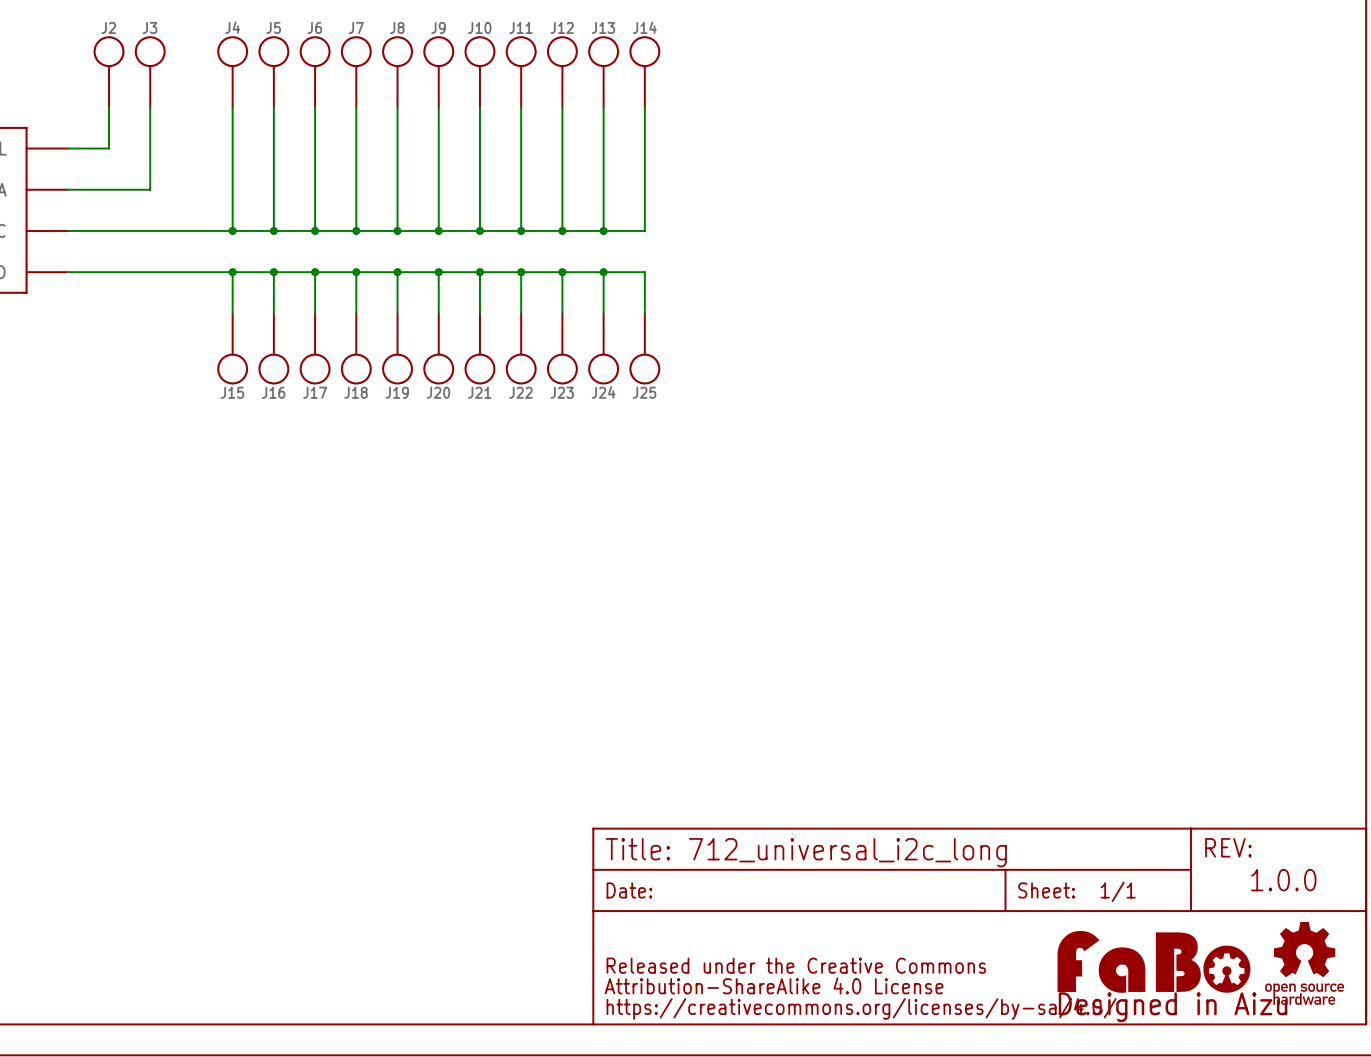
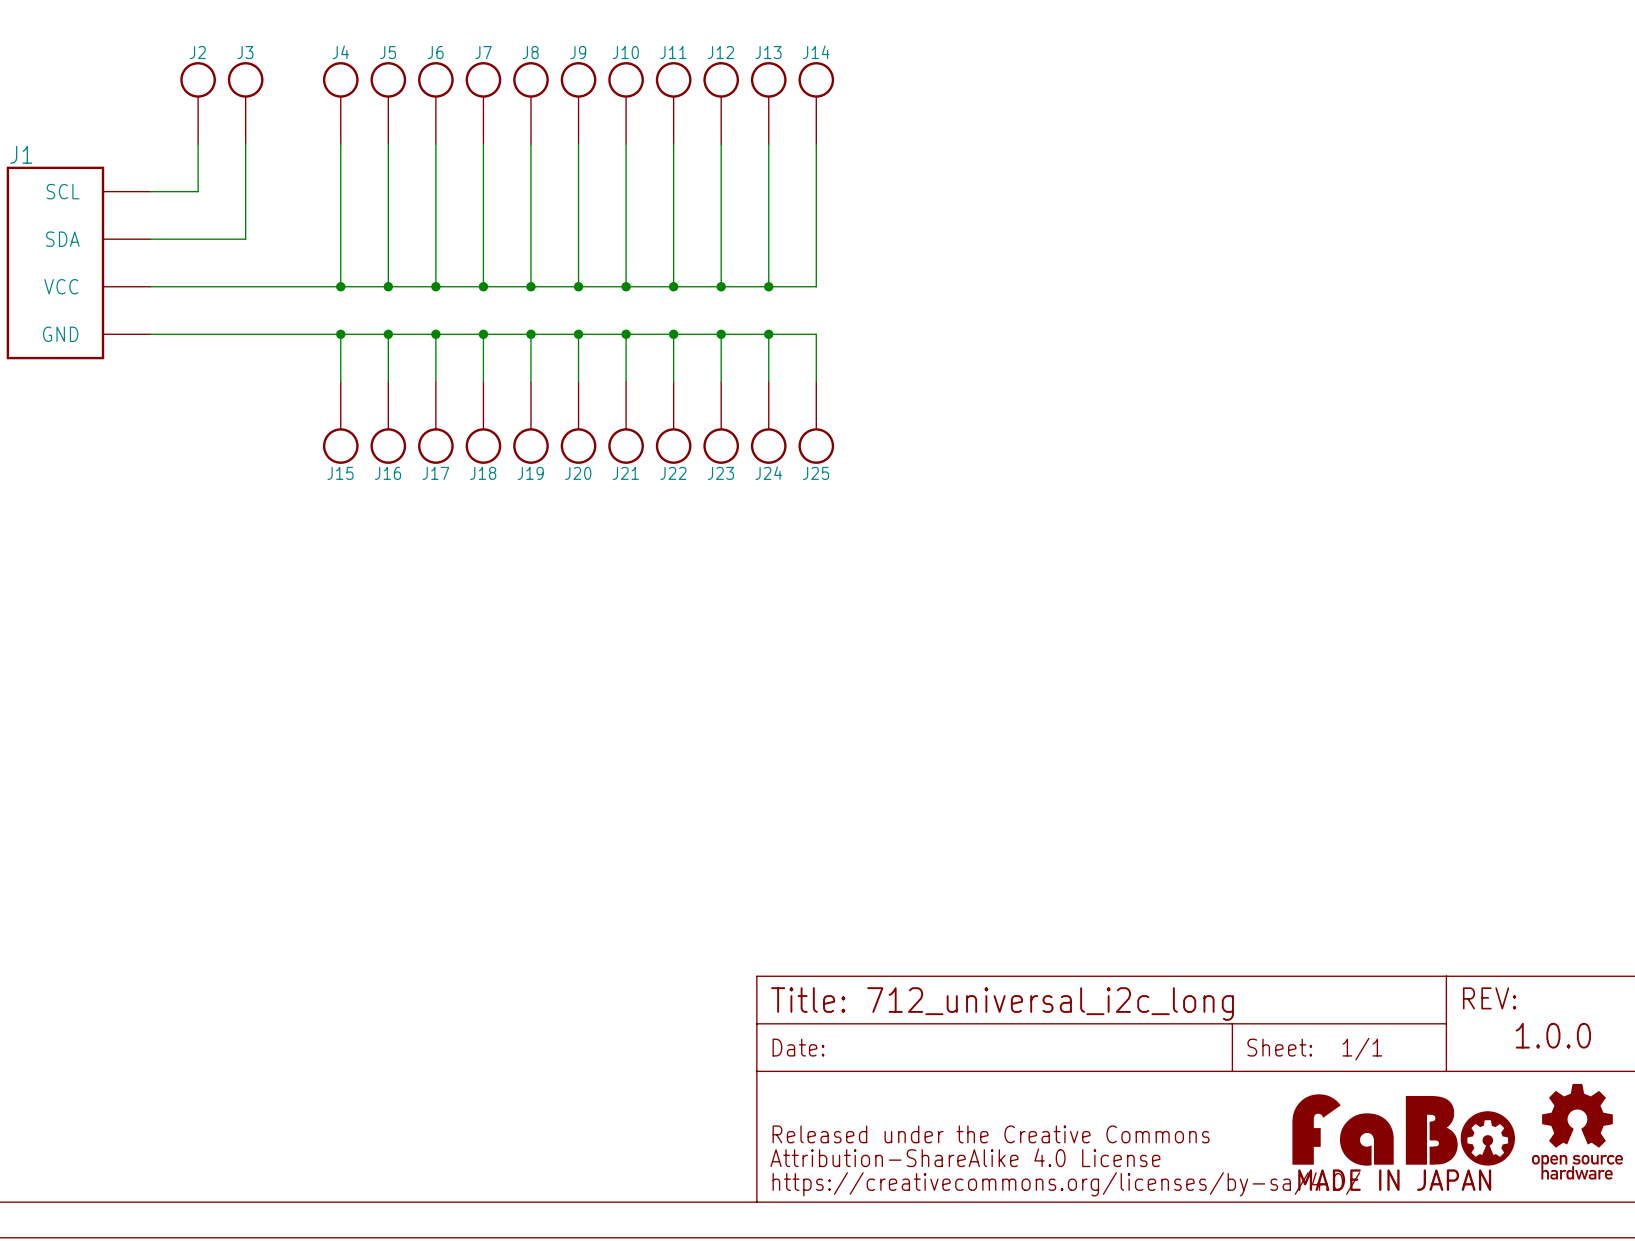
part text: none -> MADE IN JAPAN (1394, 1180)
part text: Designed in Aizu (1173, 1007) -> none

